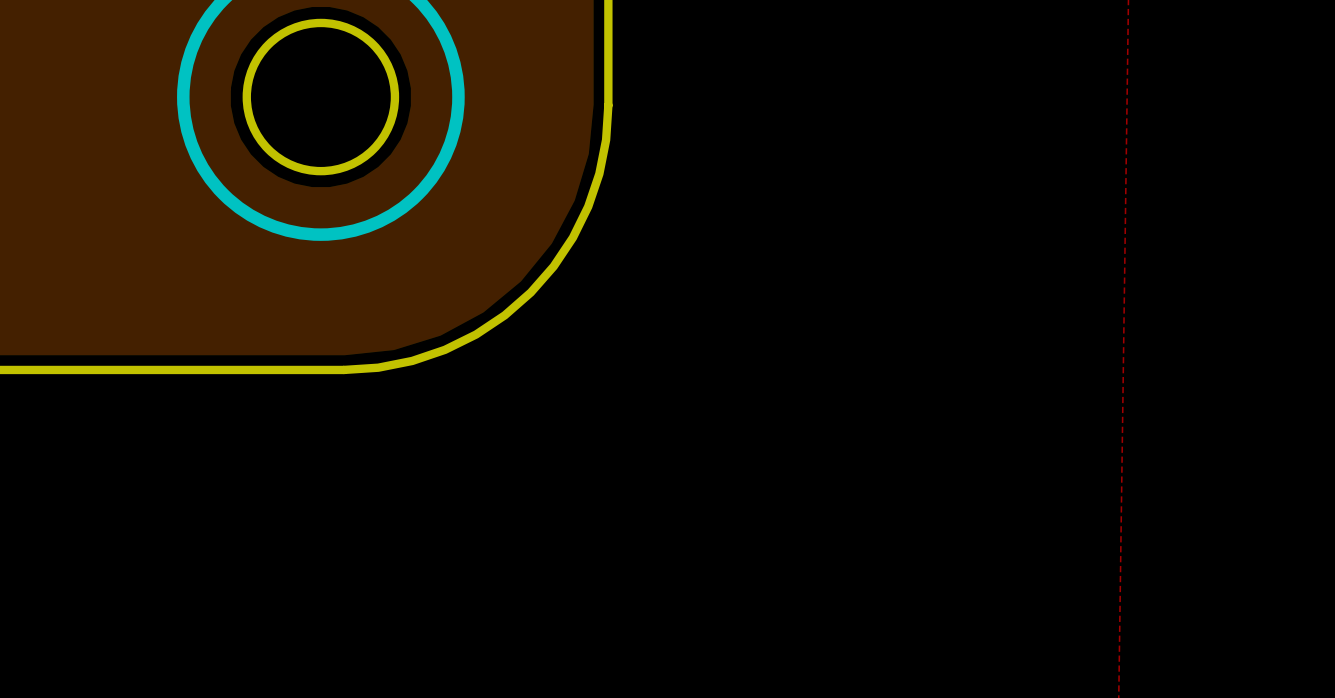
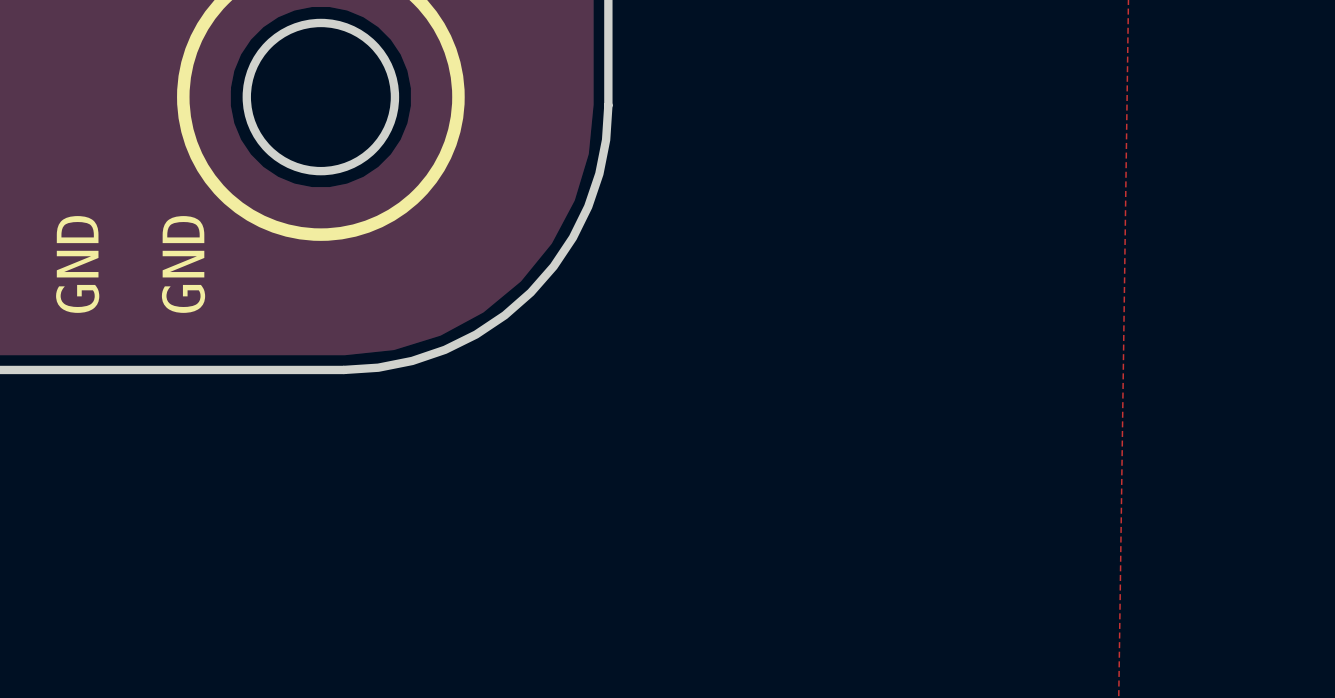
text: none -> GND (77, 264)
text: none -> GND (183, 264)

